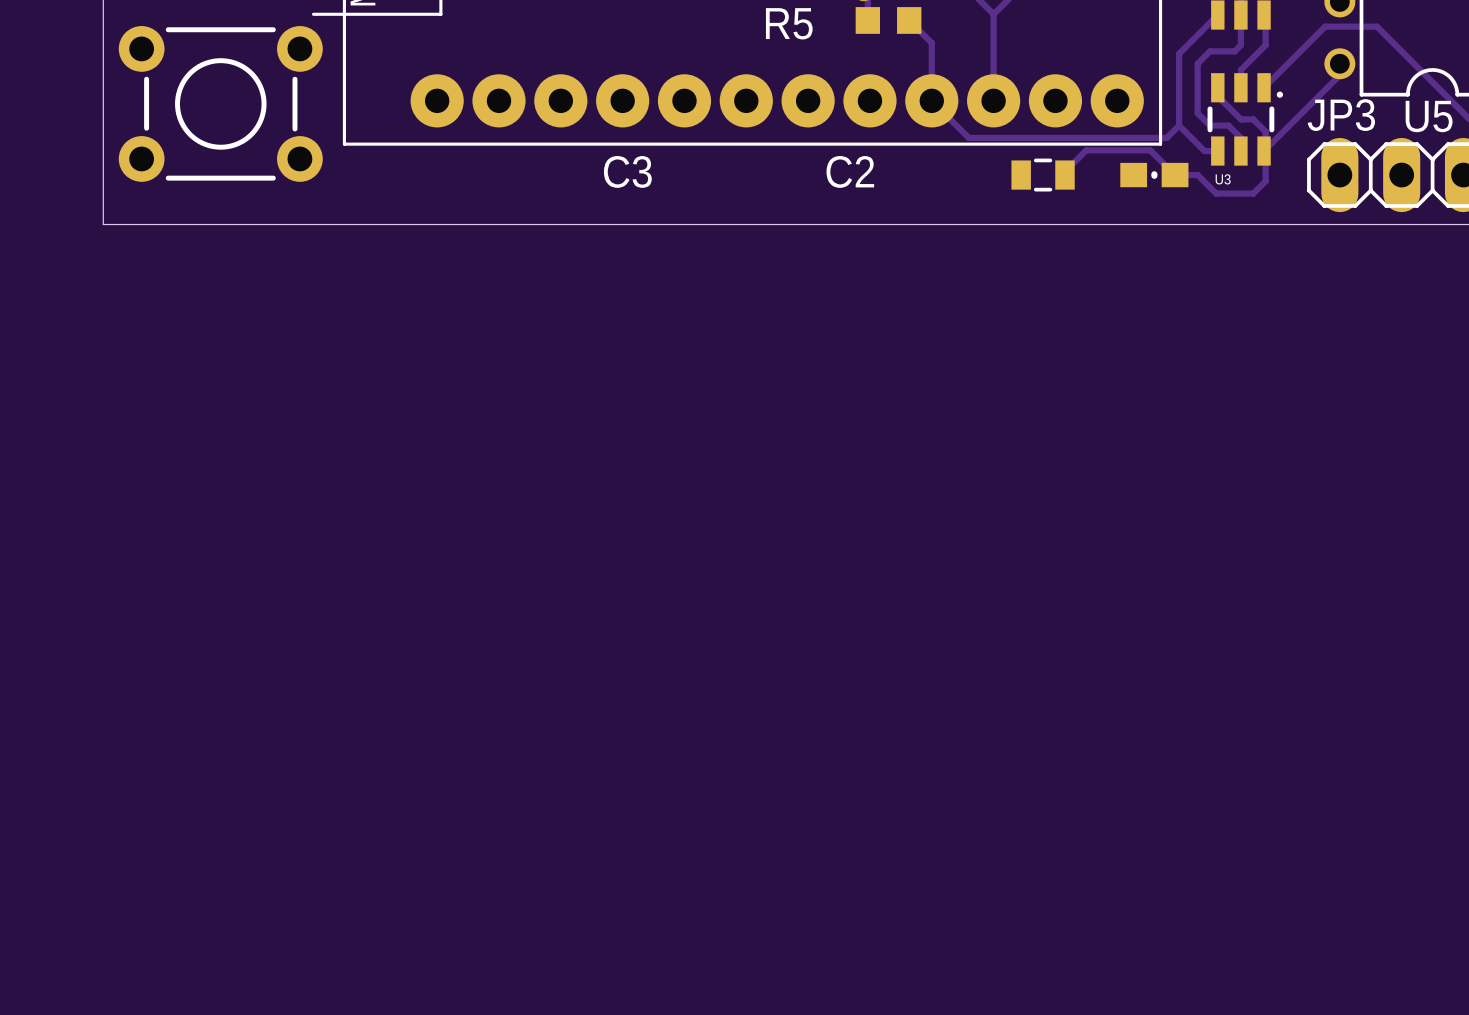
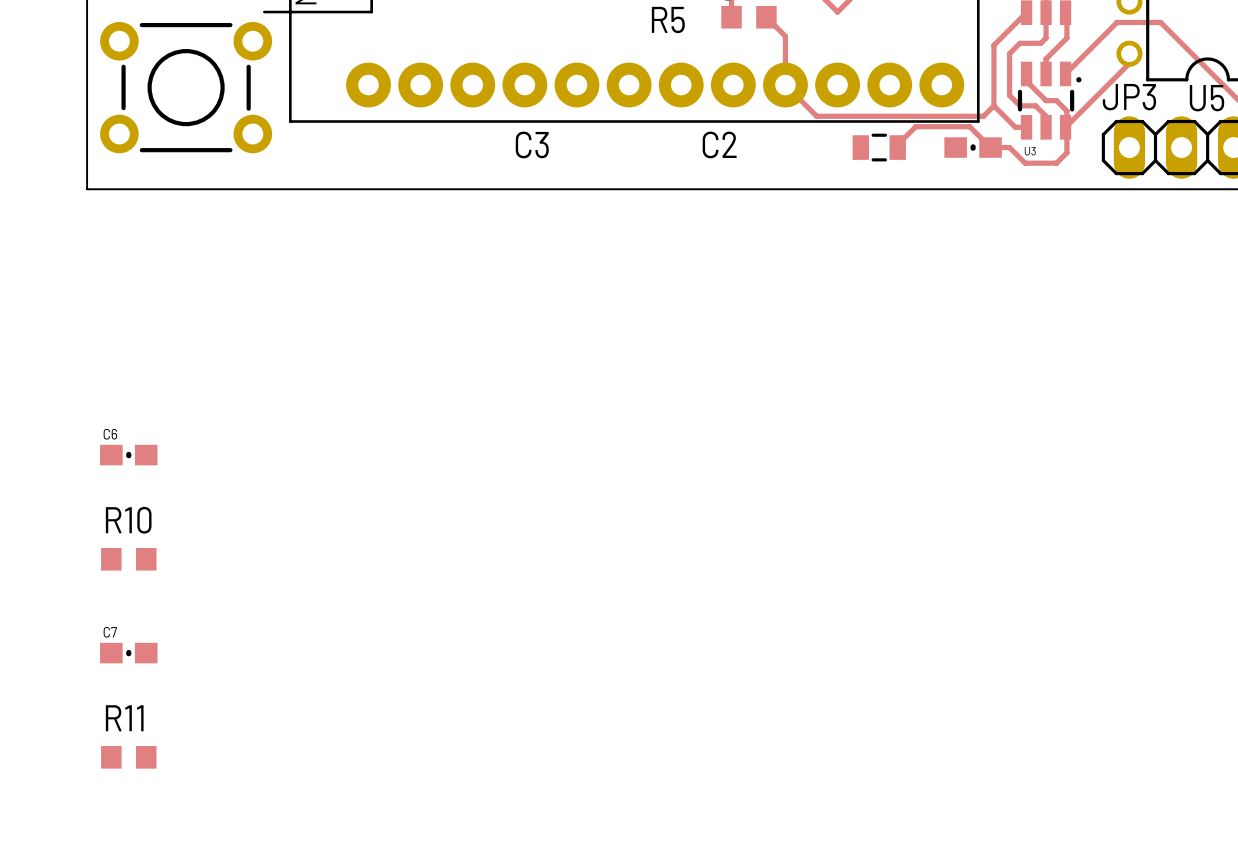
track: (993, 14) (993, 100) -> none
C6: none -> (128, 455)
R10: none -> (128, 559)
C7: none -> (128, 653)
R11: none -> (128, 757)

